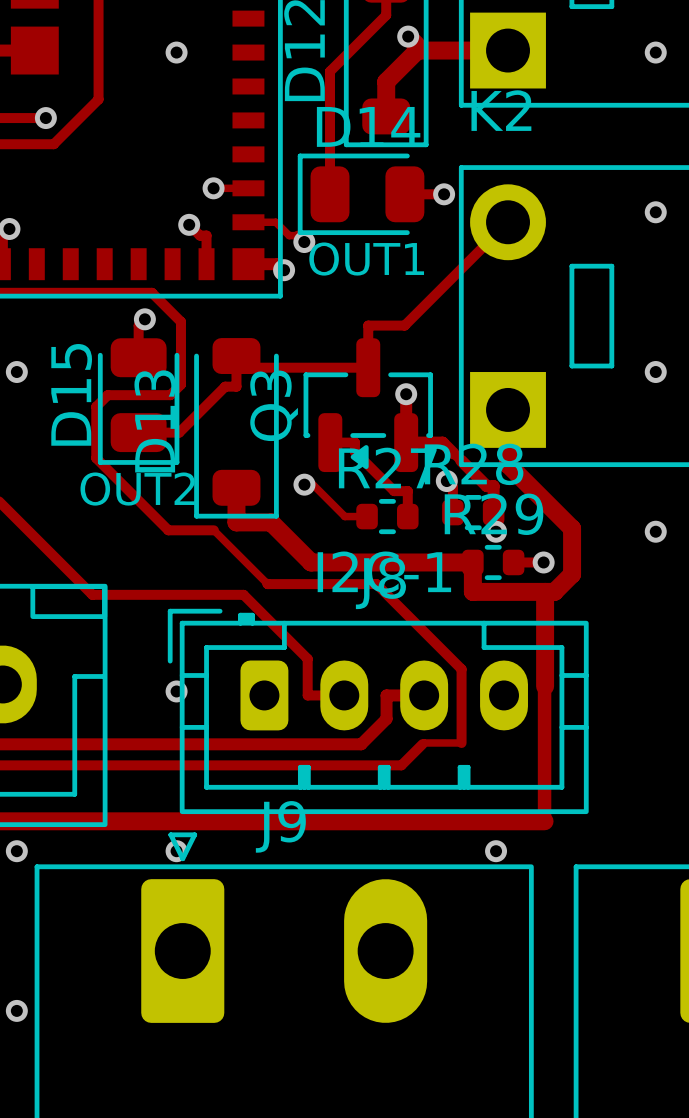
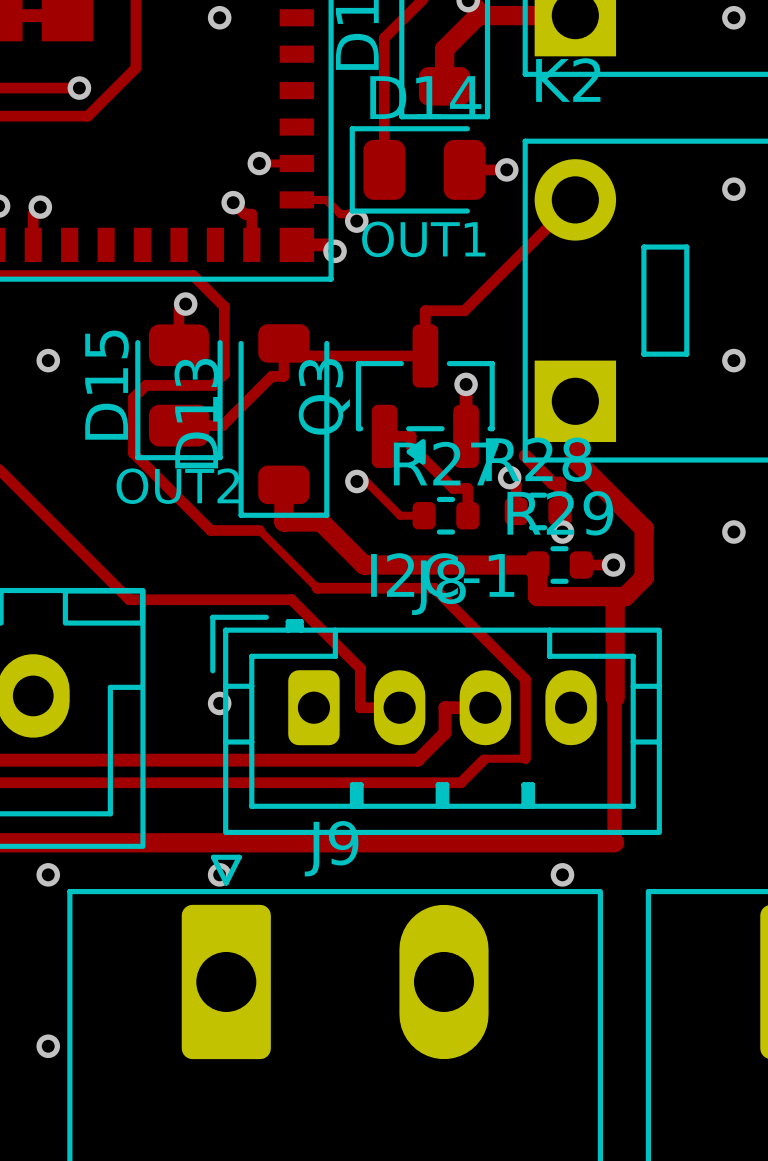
track: (406, 442) (442, 442) (460, 460) -> none

